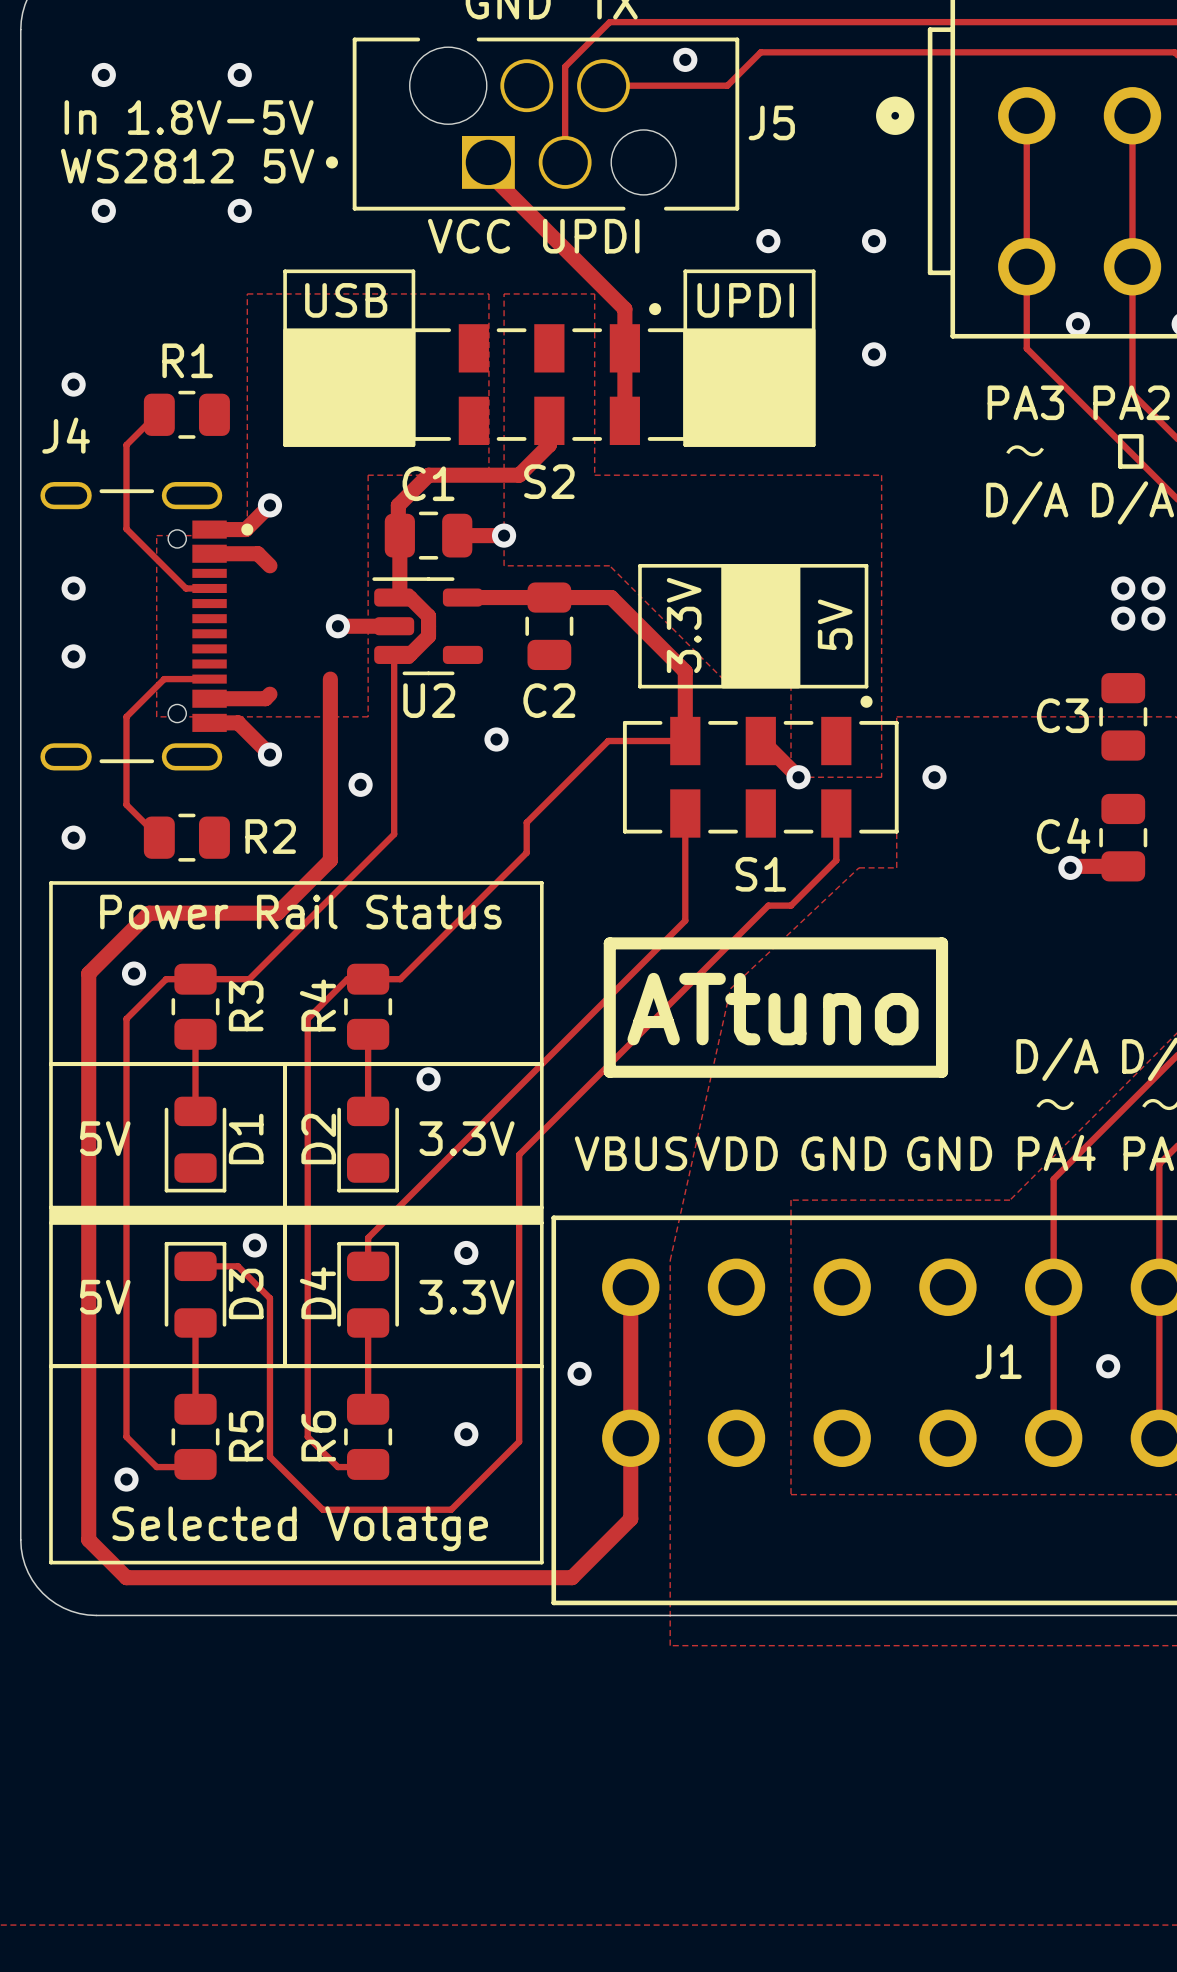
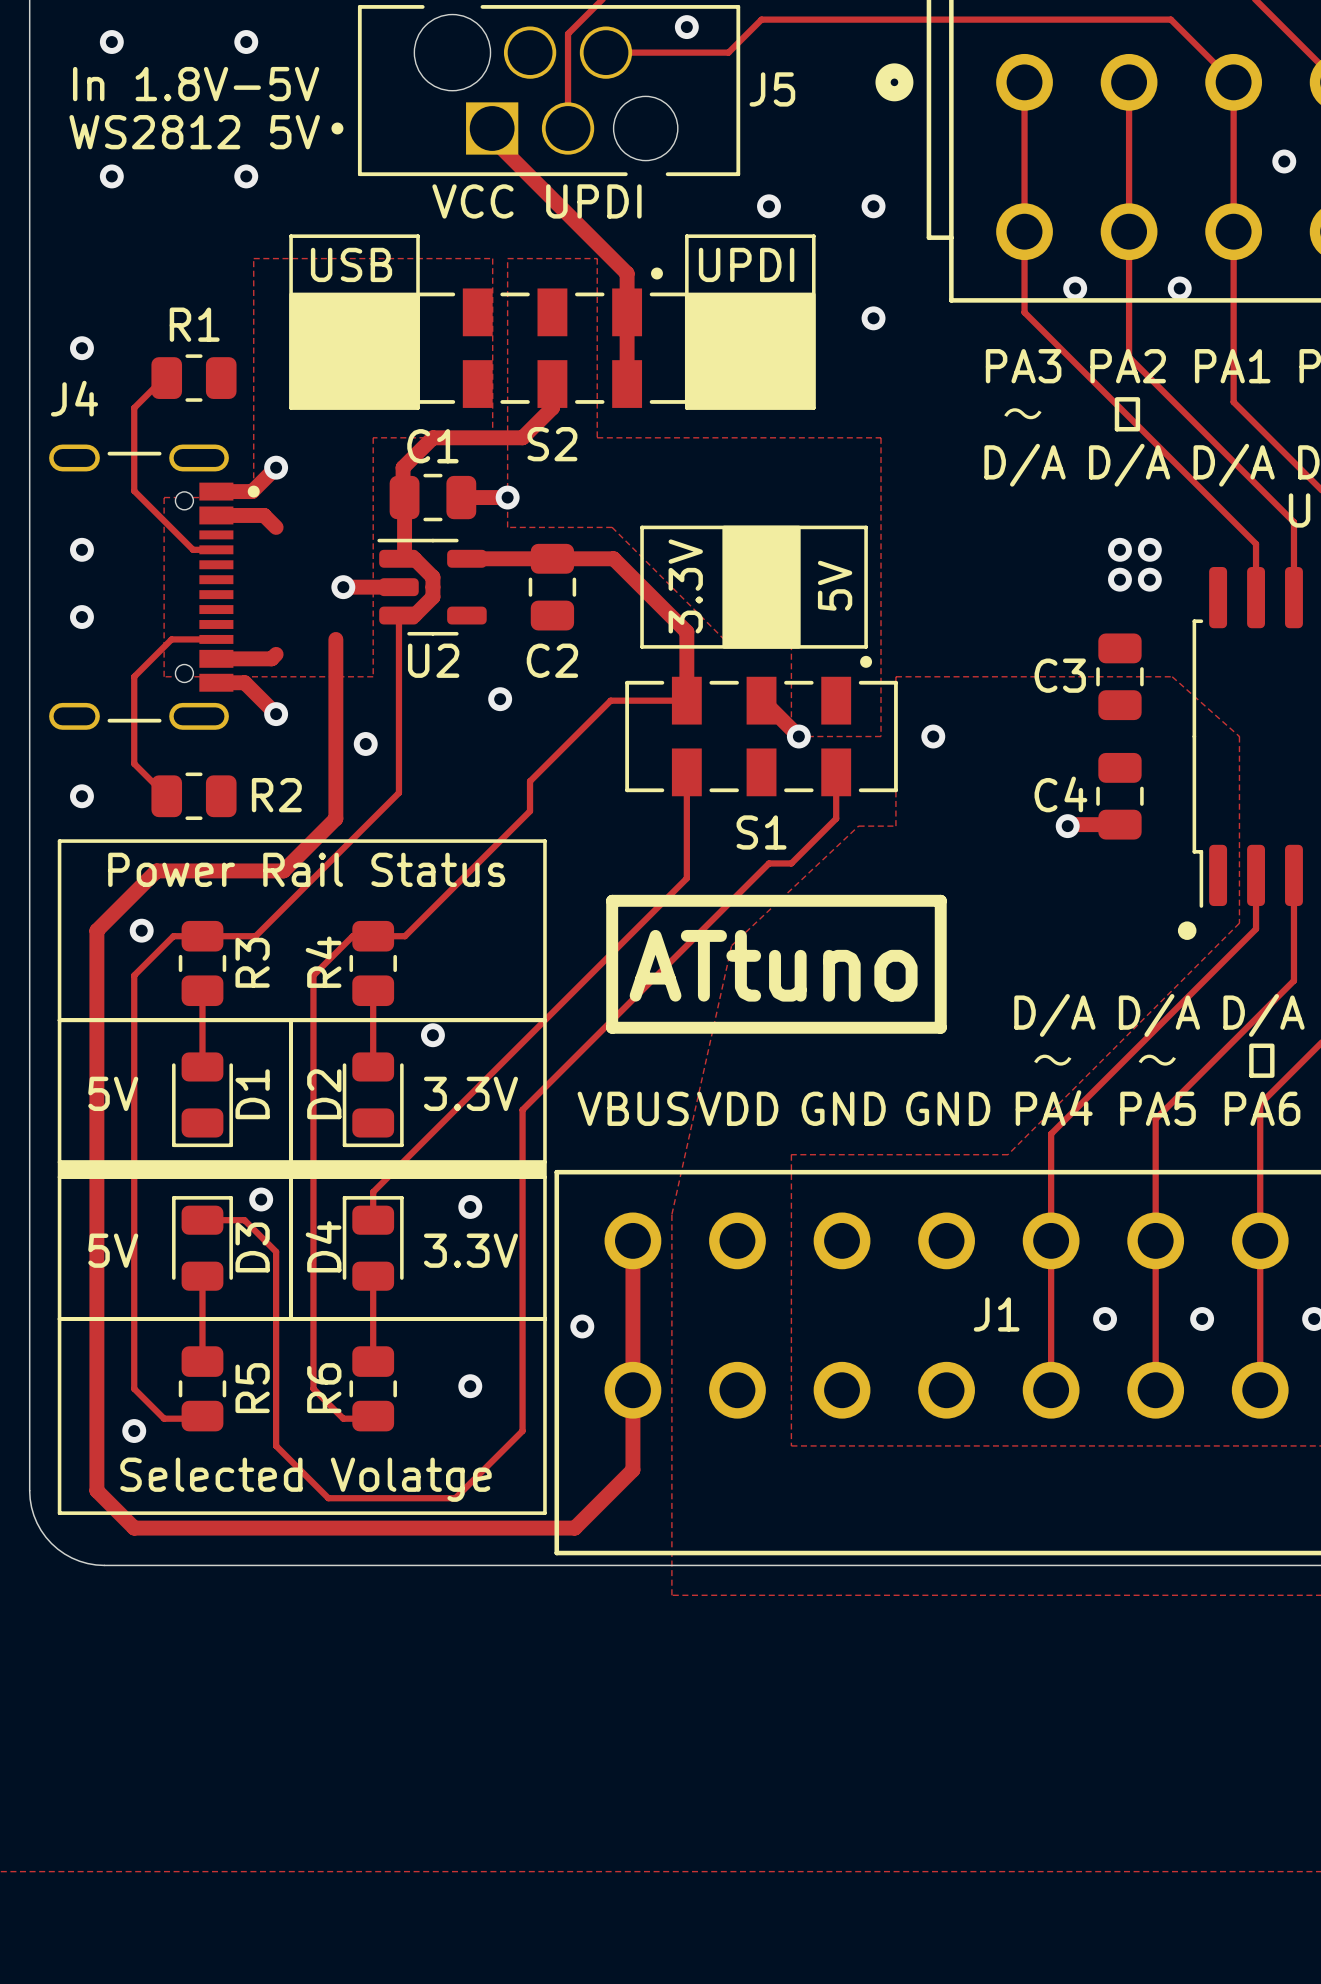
track: (519, 1441) (451, 1509) (322, 1509) (269, 1456) -> (522, 1393) (522, 1431) (455, 1498) (328, 1498) (276, 1445) (276, 1408)

